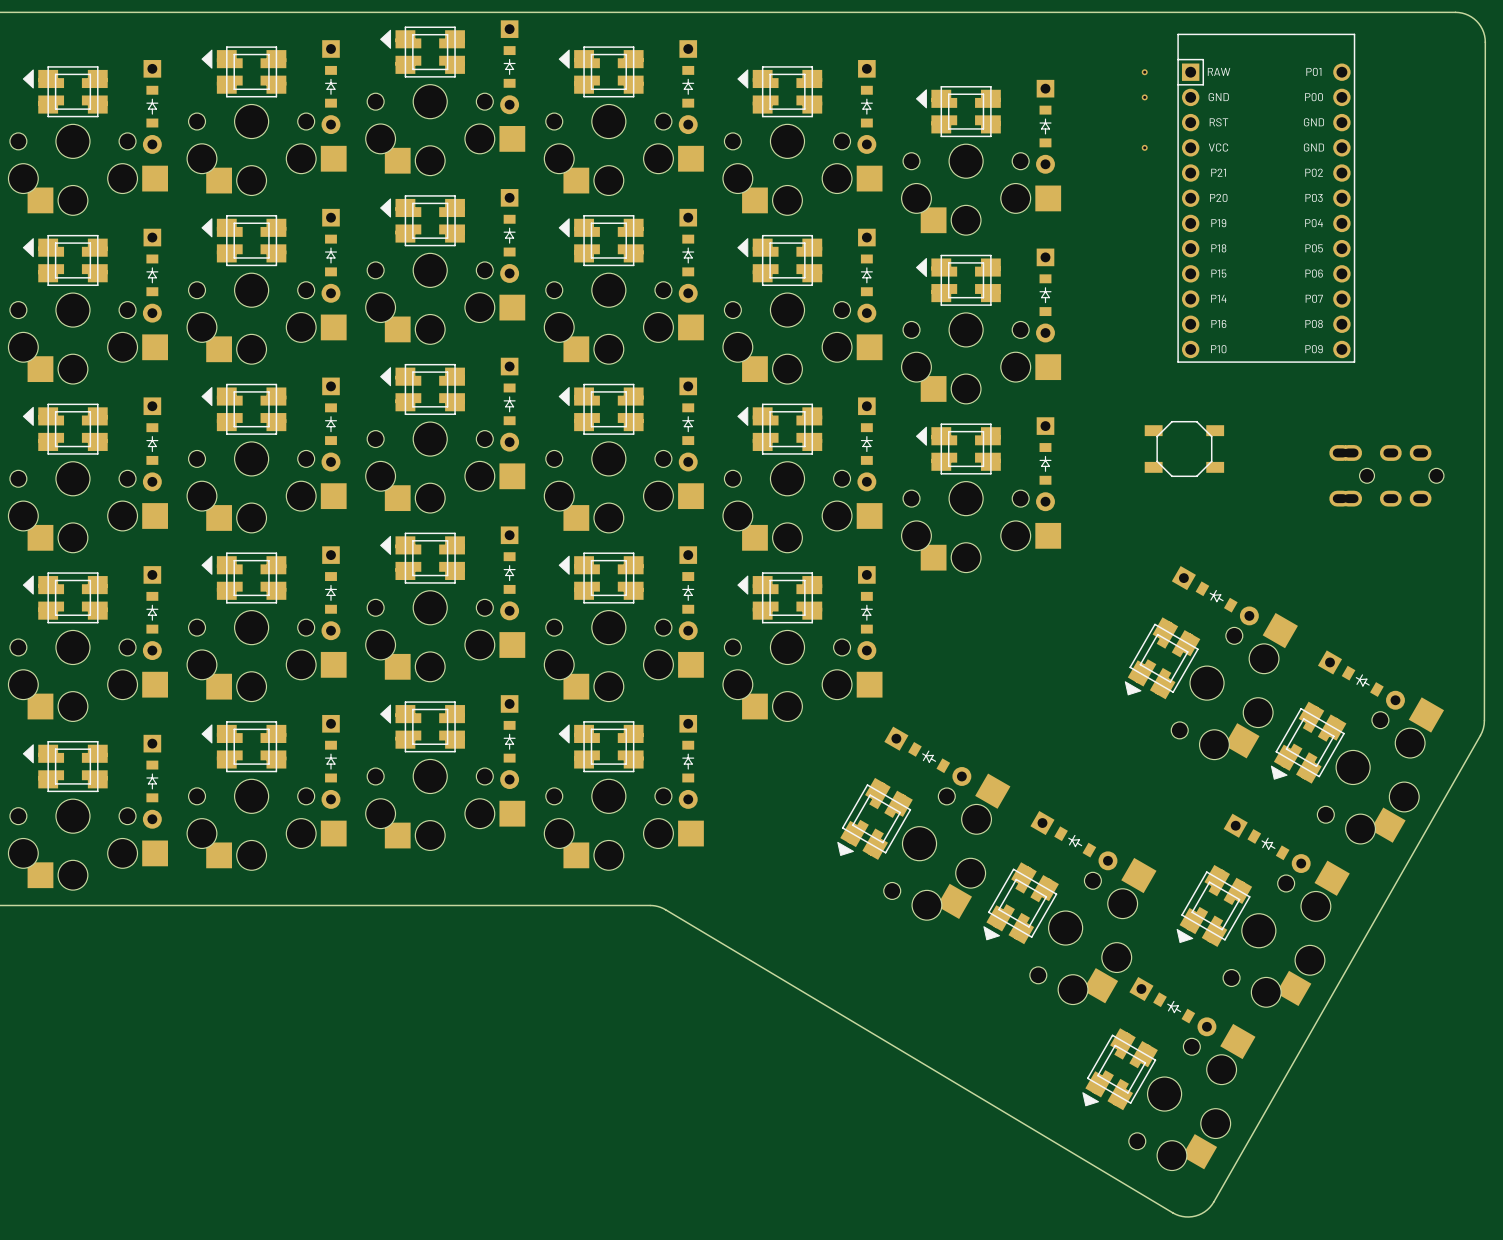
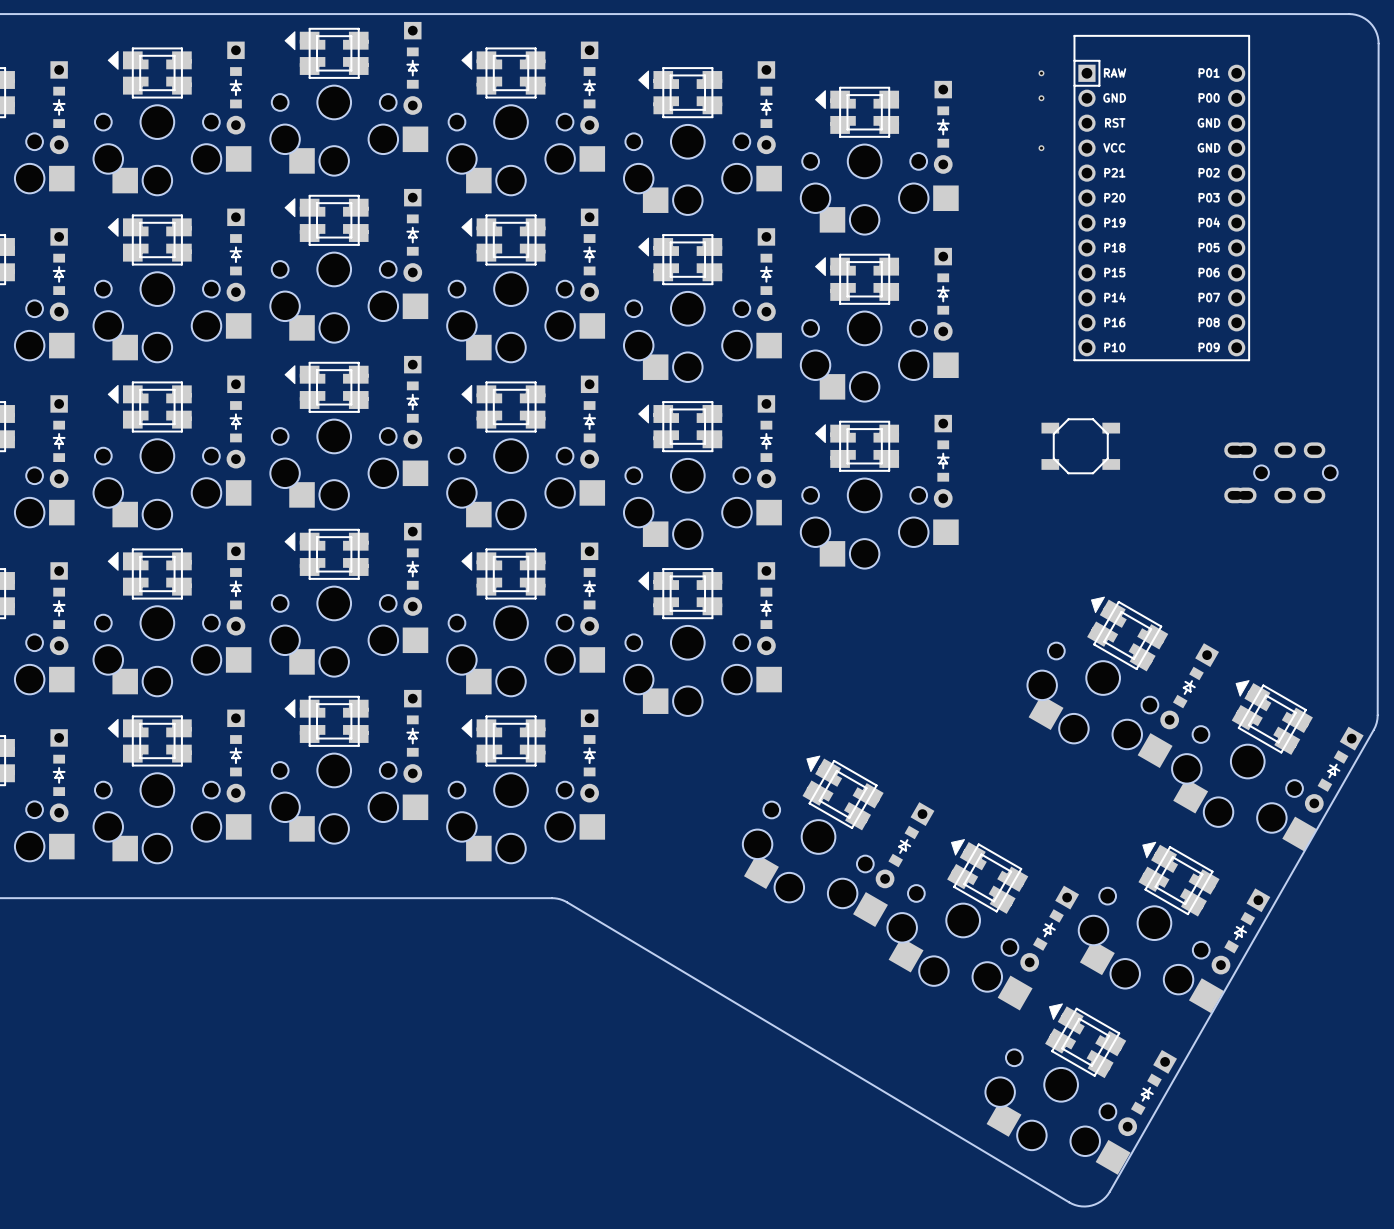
part: (1215, 595) -> none
part: none -> (1127, 634)
part: (1162, 658) -> none
part: (1361, 680) -> none
part rotation: 0° (1234, 686) -> 90° clockwise (1100, 705)
part: none -> (1189, 686)
part: none -> (1272, 717)
part: (1308, 742) -> none
part: (927, 756) -> none
part rotation: 0° (1380, 770) -> 90° clockwise (1244, 788)
part: none -> (1334, 769)
part: none -> (843, 792)
part: (875, 818) -> none
part: (1073, 840) -> none
part: (1267, 843) -> none
part rotation: 0° (947, 846) -> 90° clockwise (815, 864)
part: none -> (905, 845)
part: none -> (987, 876)
part: none -> (1179, 879)
part: (1021, 903) -> none
part: (1214, 905) -> none
part rotation: 0° (1093, 931) -> 90° clockwise (960, 947)
part rotation: 0° (1286, 933) -> 90° clockwise (1151, 950)
part: none -> (1049, 928)
part: none -> (1240, 931)
part: (1172, 1006) -> none
part rotation: 0° (1120, 1069) -> 90° clockwise (1085, 1040)
part position: (1120, 1069) -> (1085, 1040)
part rotation: 0° (1192, 1097) -> 90° clockwise (1057, 1112)
part: none -> (1147, 1093)

